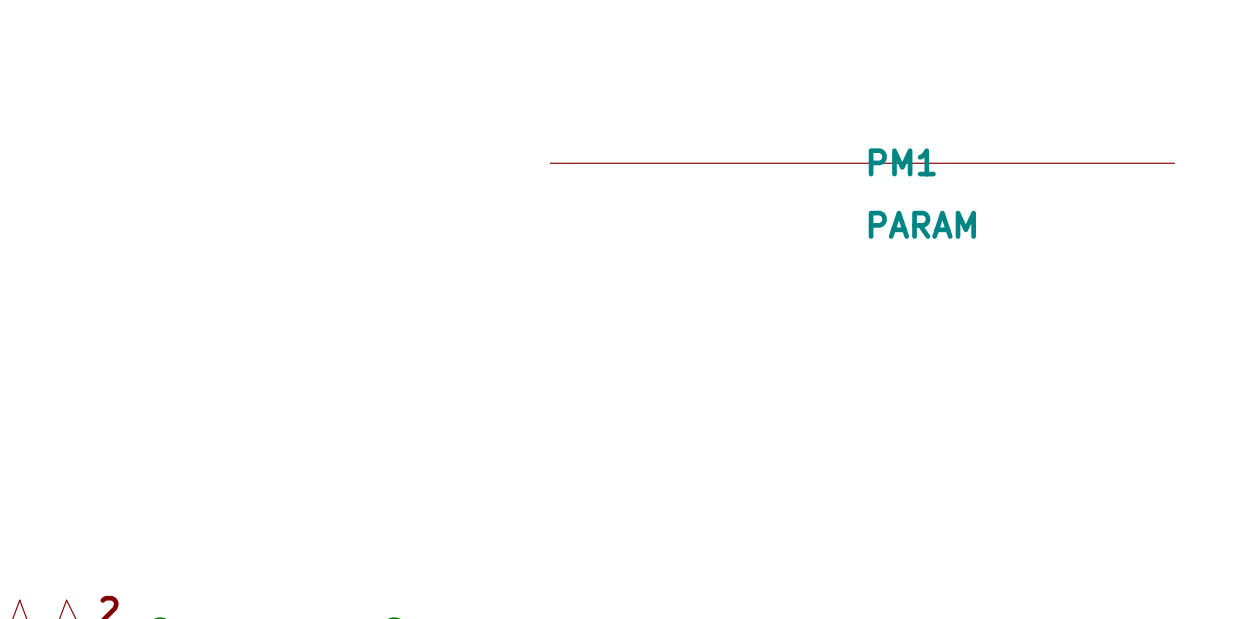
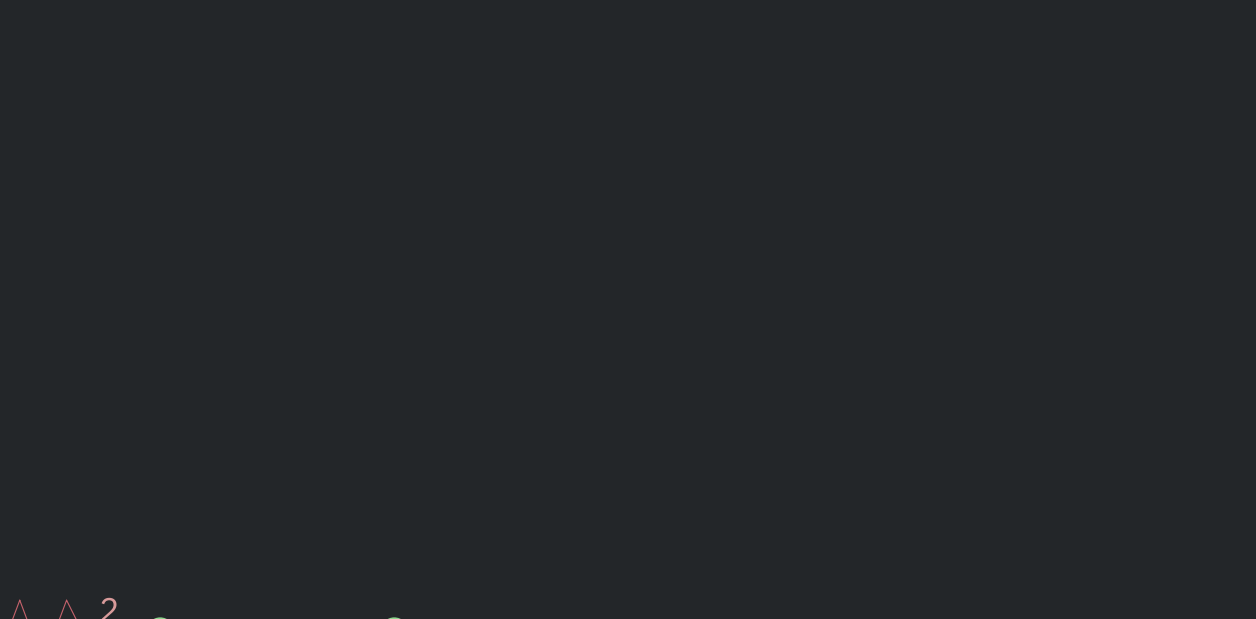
PM1: PARAM (862, 163) -> none

